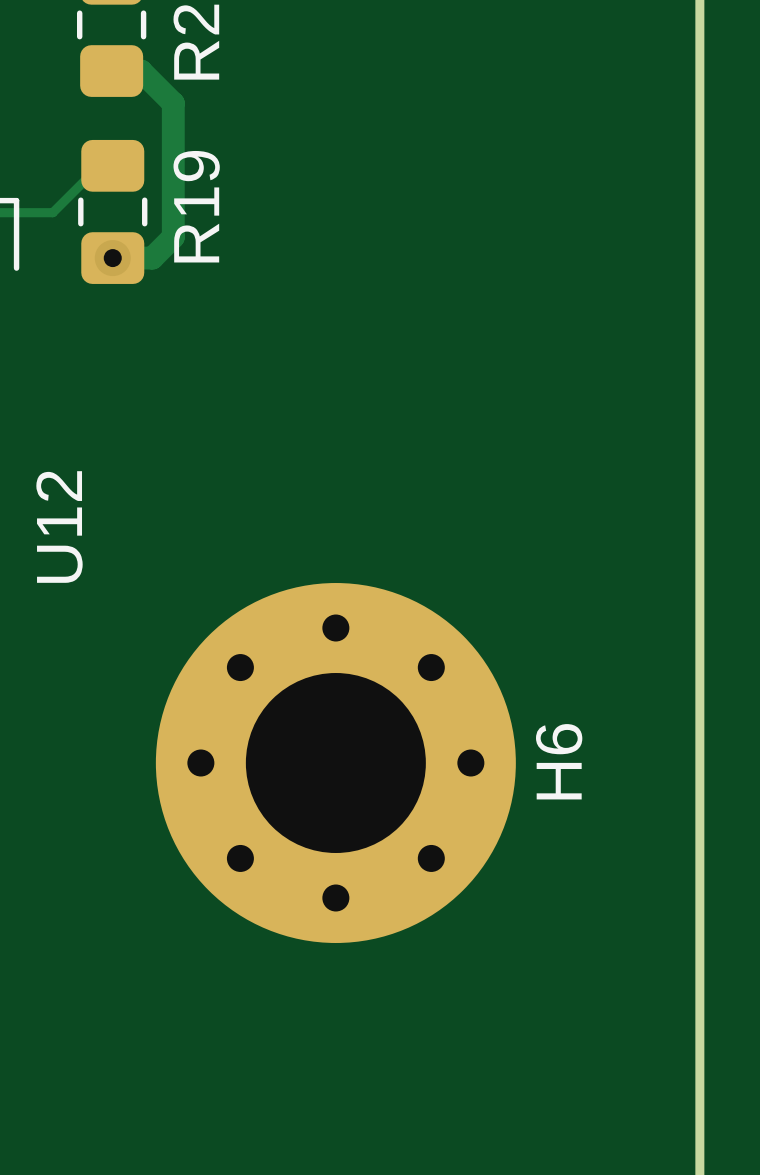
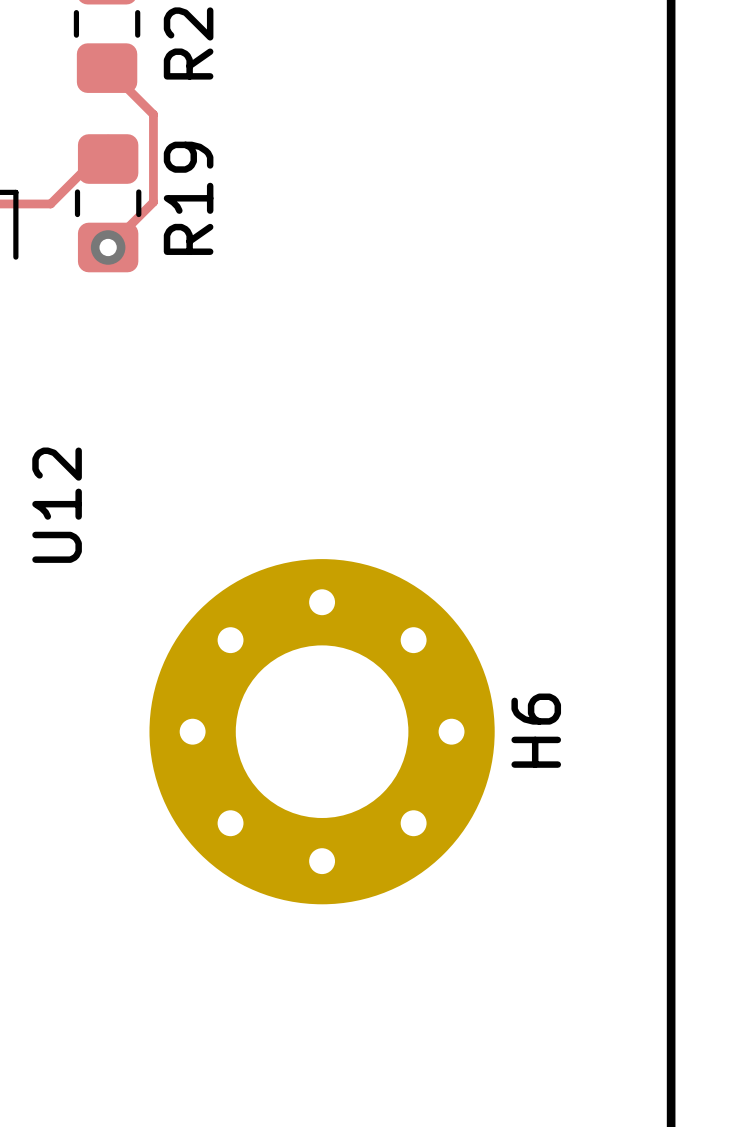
track: (111, 71) (141, 71) (173, 103) (173, 237) (152, 258) (112, 258) -> (107, 68) (153, 114) (153, 202) (108, 247)

